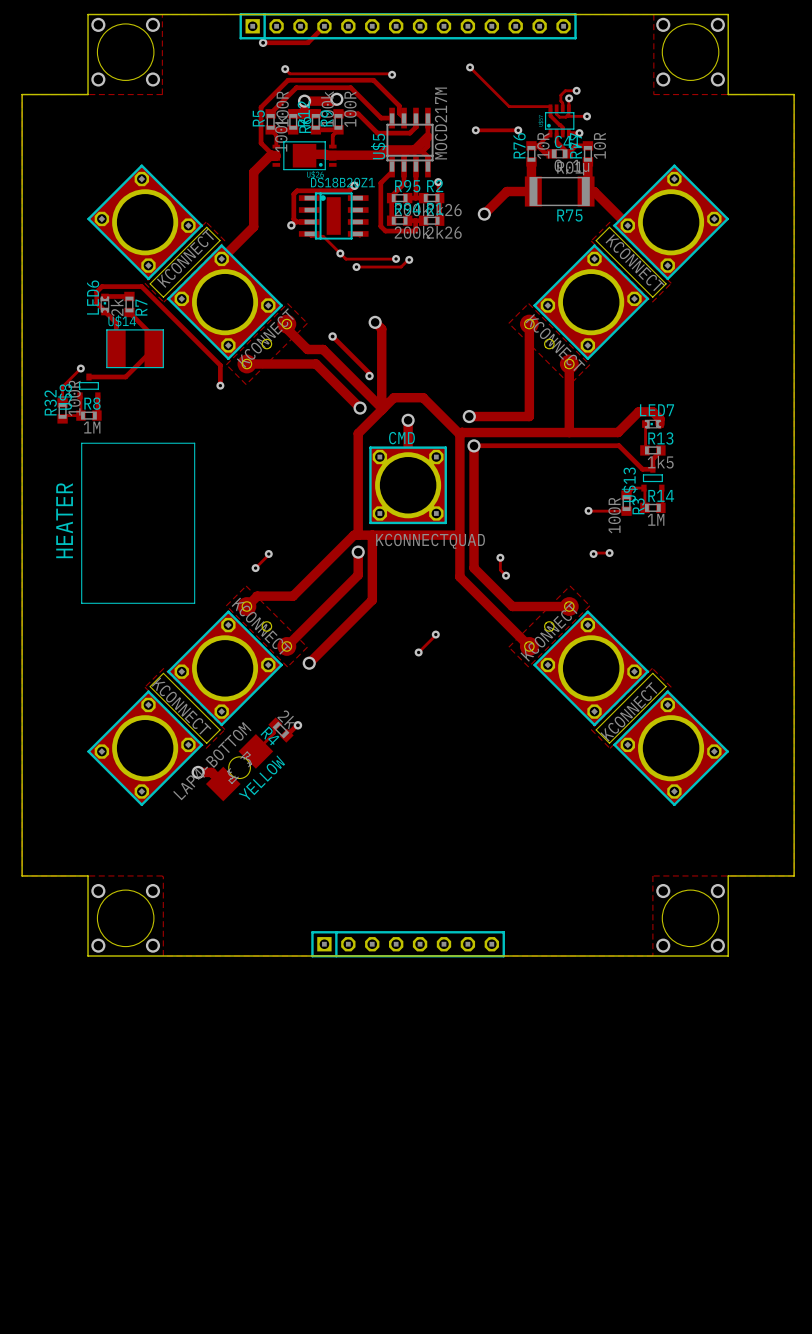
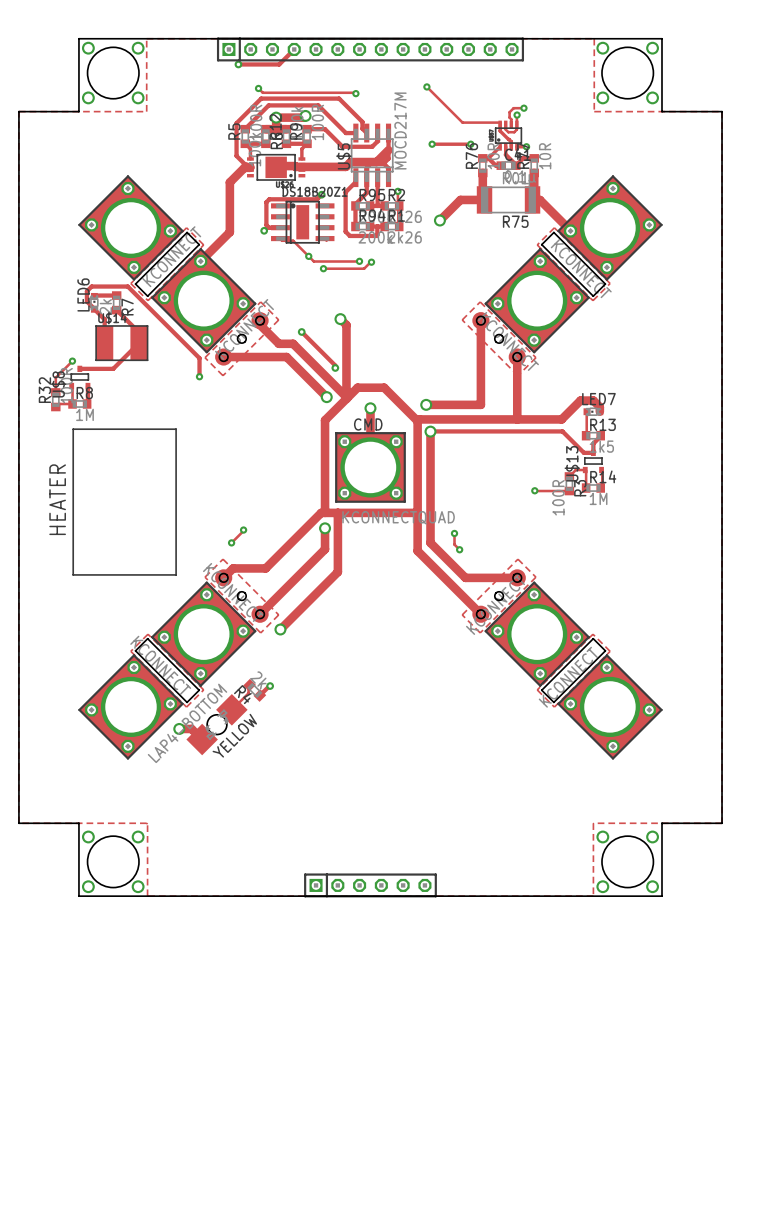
track: (567, 115) (586, 116) -> none
via: (587, 116) -> none
via: (593, 553) -> none
track: (609, 553) (593, 553) -> none
via: (609, 553) -> none
track: (435, 634) (418, 652) -> none
via: (435, 634) -> none
via: (418, 652) -> none
part footprint: [311, 931, 505, 958] -> [304, 873, 437, 898]

